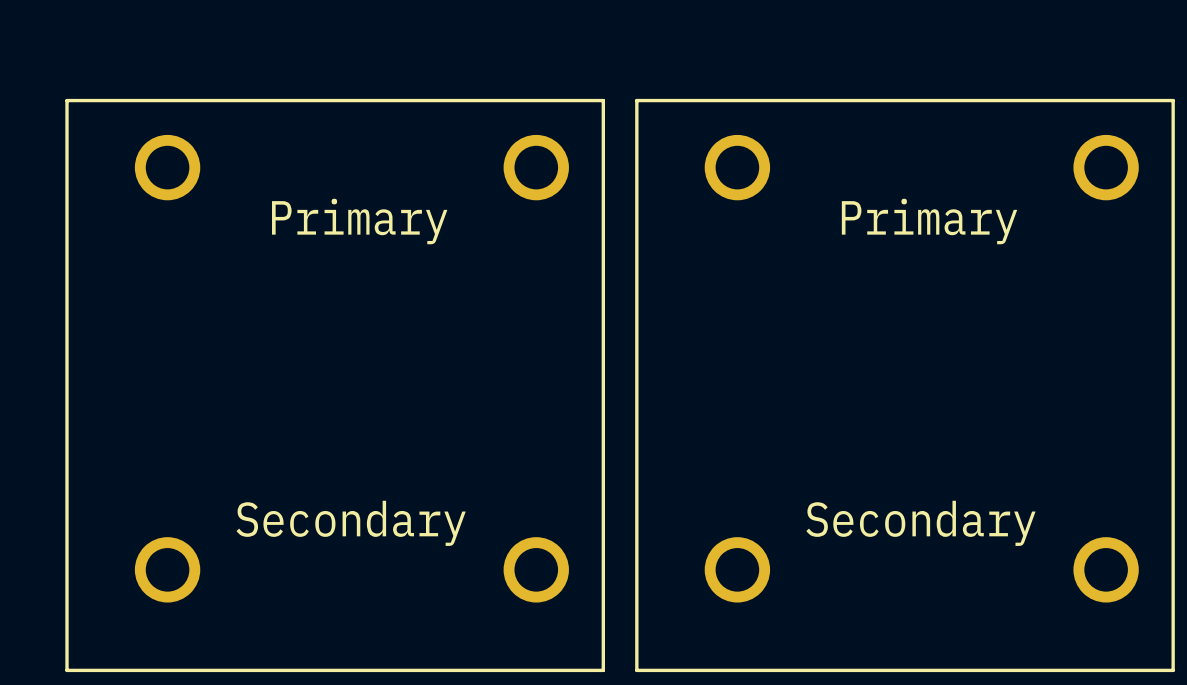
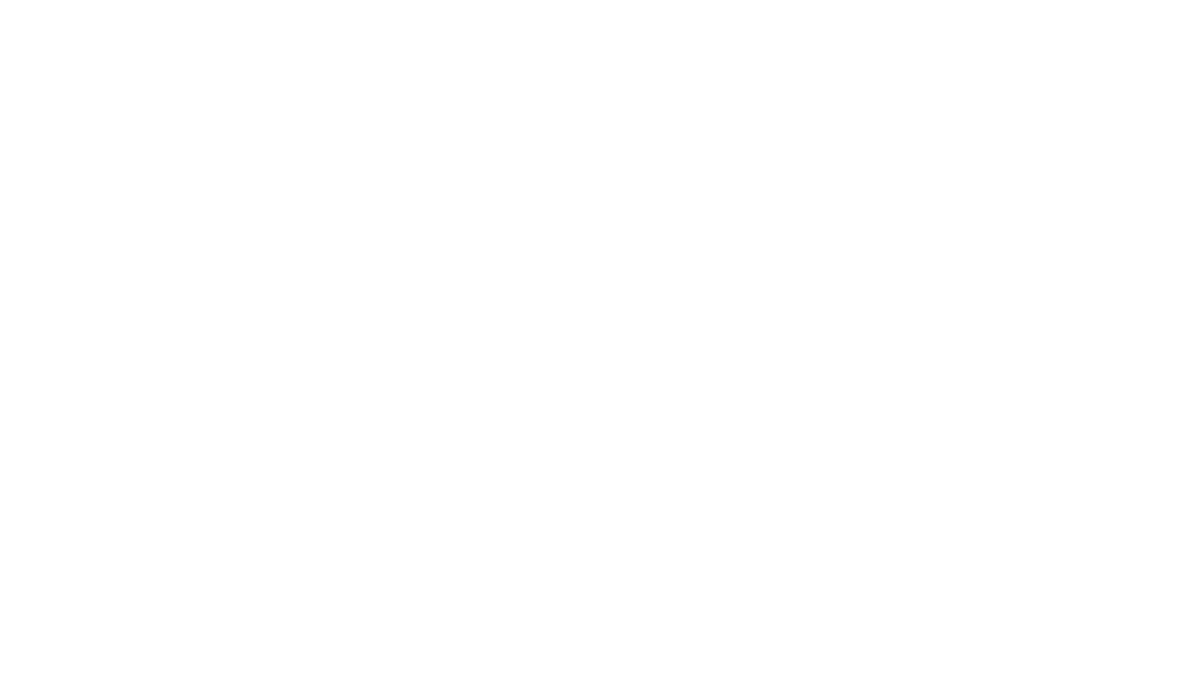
part: (335, 385) -> none
part: (905, 385) -> none

